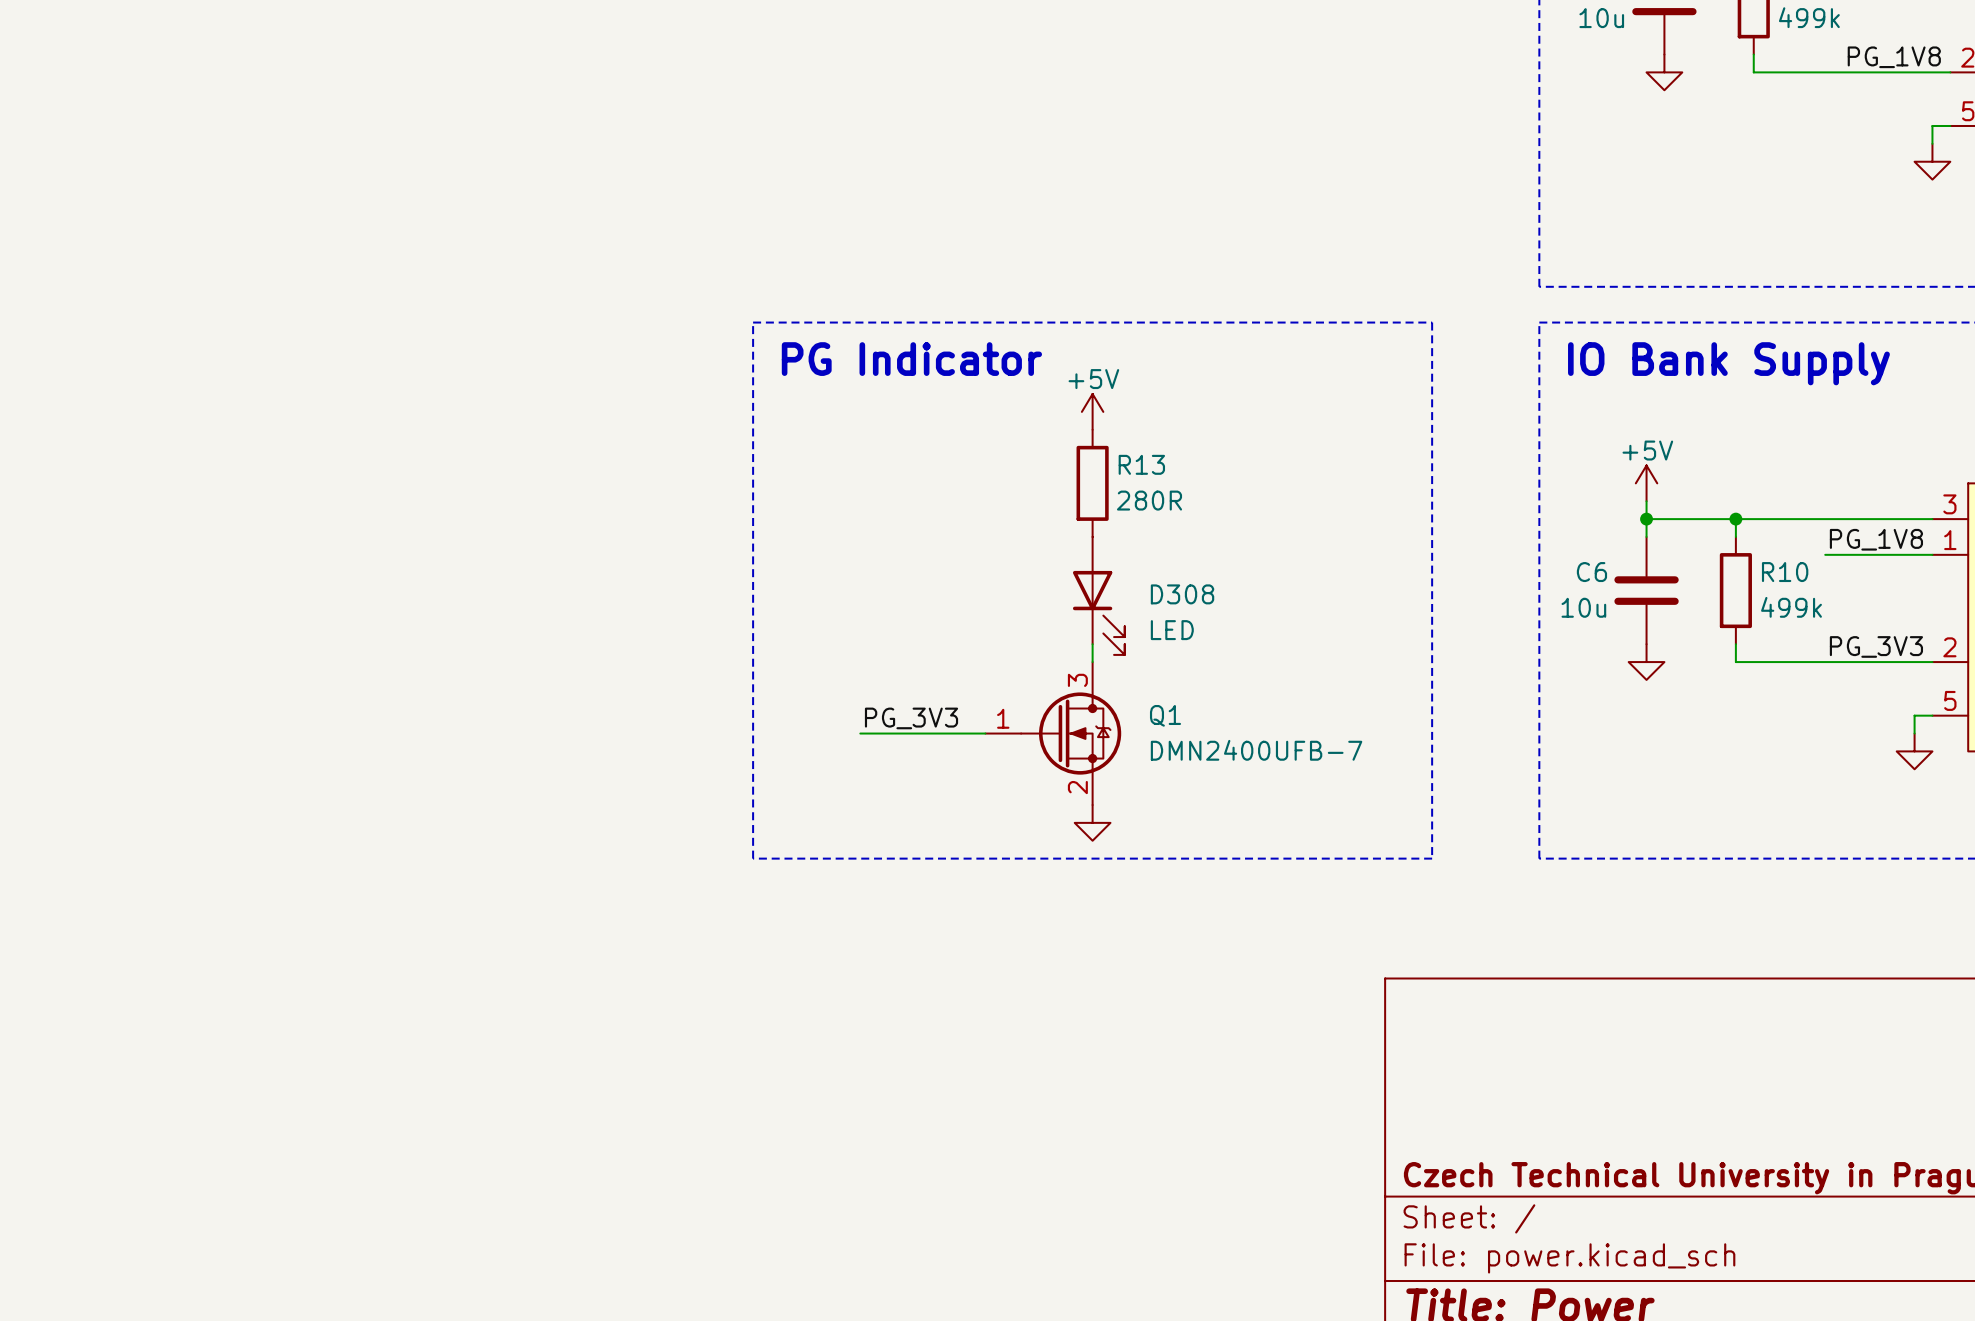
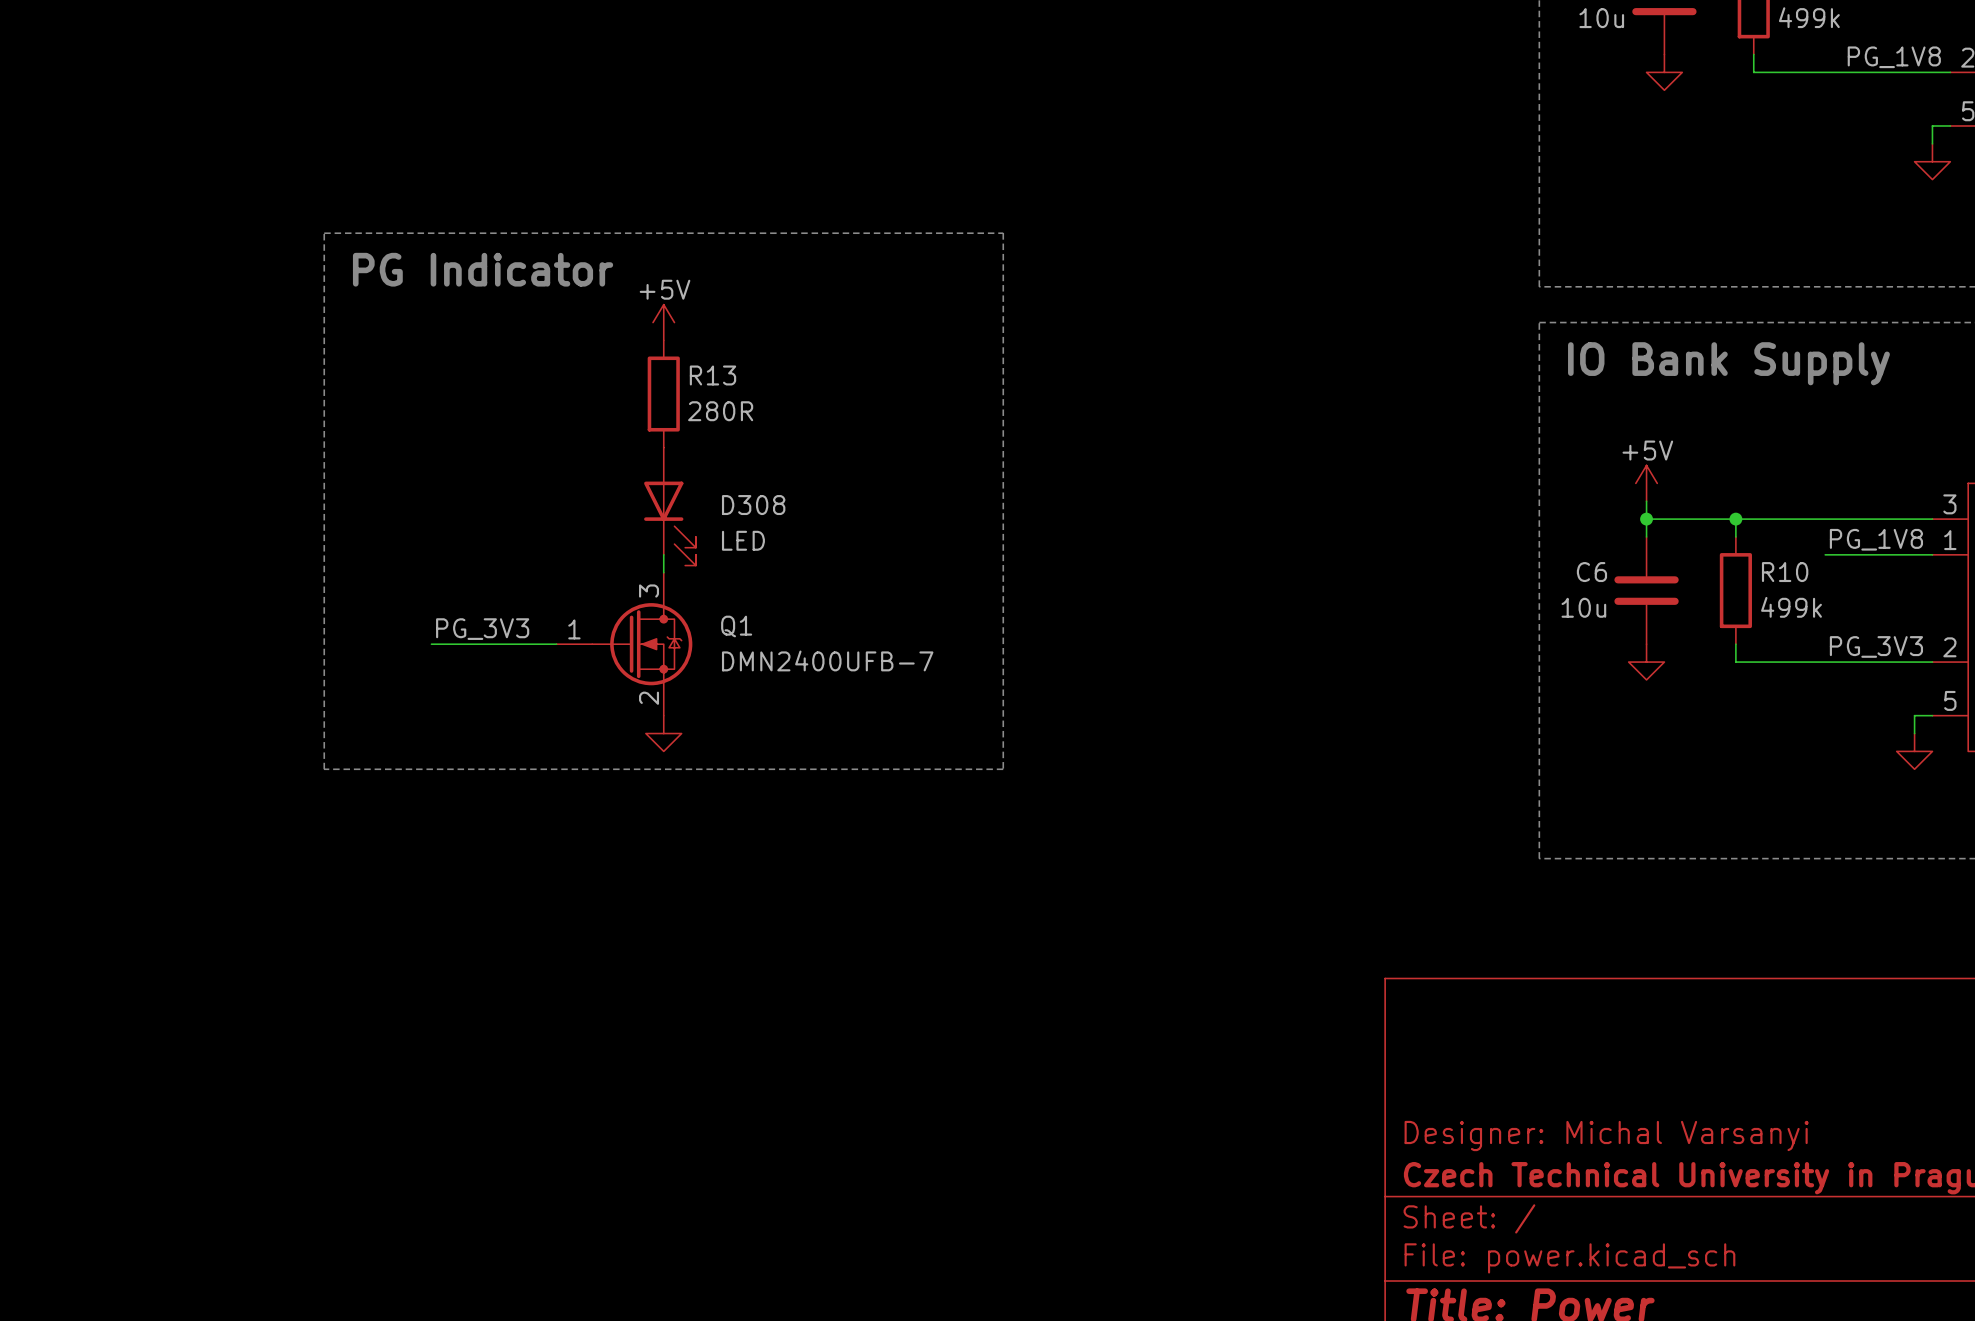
line: none -> (324, 233) (1003, 233) (1003, 769) (324, 769) (324, 233)
text: none -> PG Indicator (483, 269)
power symbol: none -> +5V (663, 322)
line: (753, 322) (1432, 322) (1432, 858) (753, 858) (753, 322) -> none
text: PG Indicator (911, 359) -> none
power symbol: +5V (1092, 411) -> none
R13 position: (1092, 483) -> (663, 394)
wire: none -> (663, 554) (663, 572)
D308 position: (1098, 595) -> (670, 506)
label: none -> PG_3V3 (482, 629)
wire: none -> (431, 644) (556, 644)
wire: (1092, 644) (1092, 662) -> none
label: PG_3V3 (911, 718) -> none
power symbol: none -> (663, 733)
wire: (860, 733) (985, 733) -> none
Q1 position: (1053, 733) -> (624, 644)
power symbol: (1092, 822) -> none
title block: none -> Designer: Michal Varsanyi (1606, 1135)

